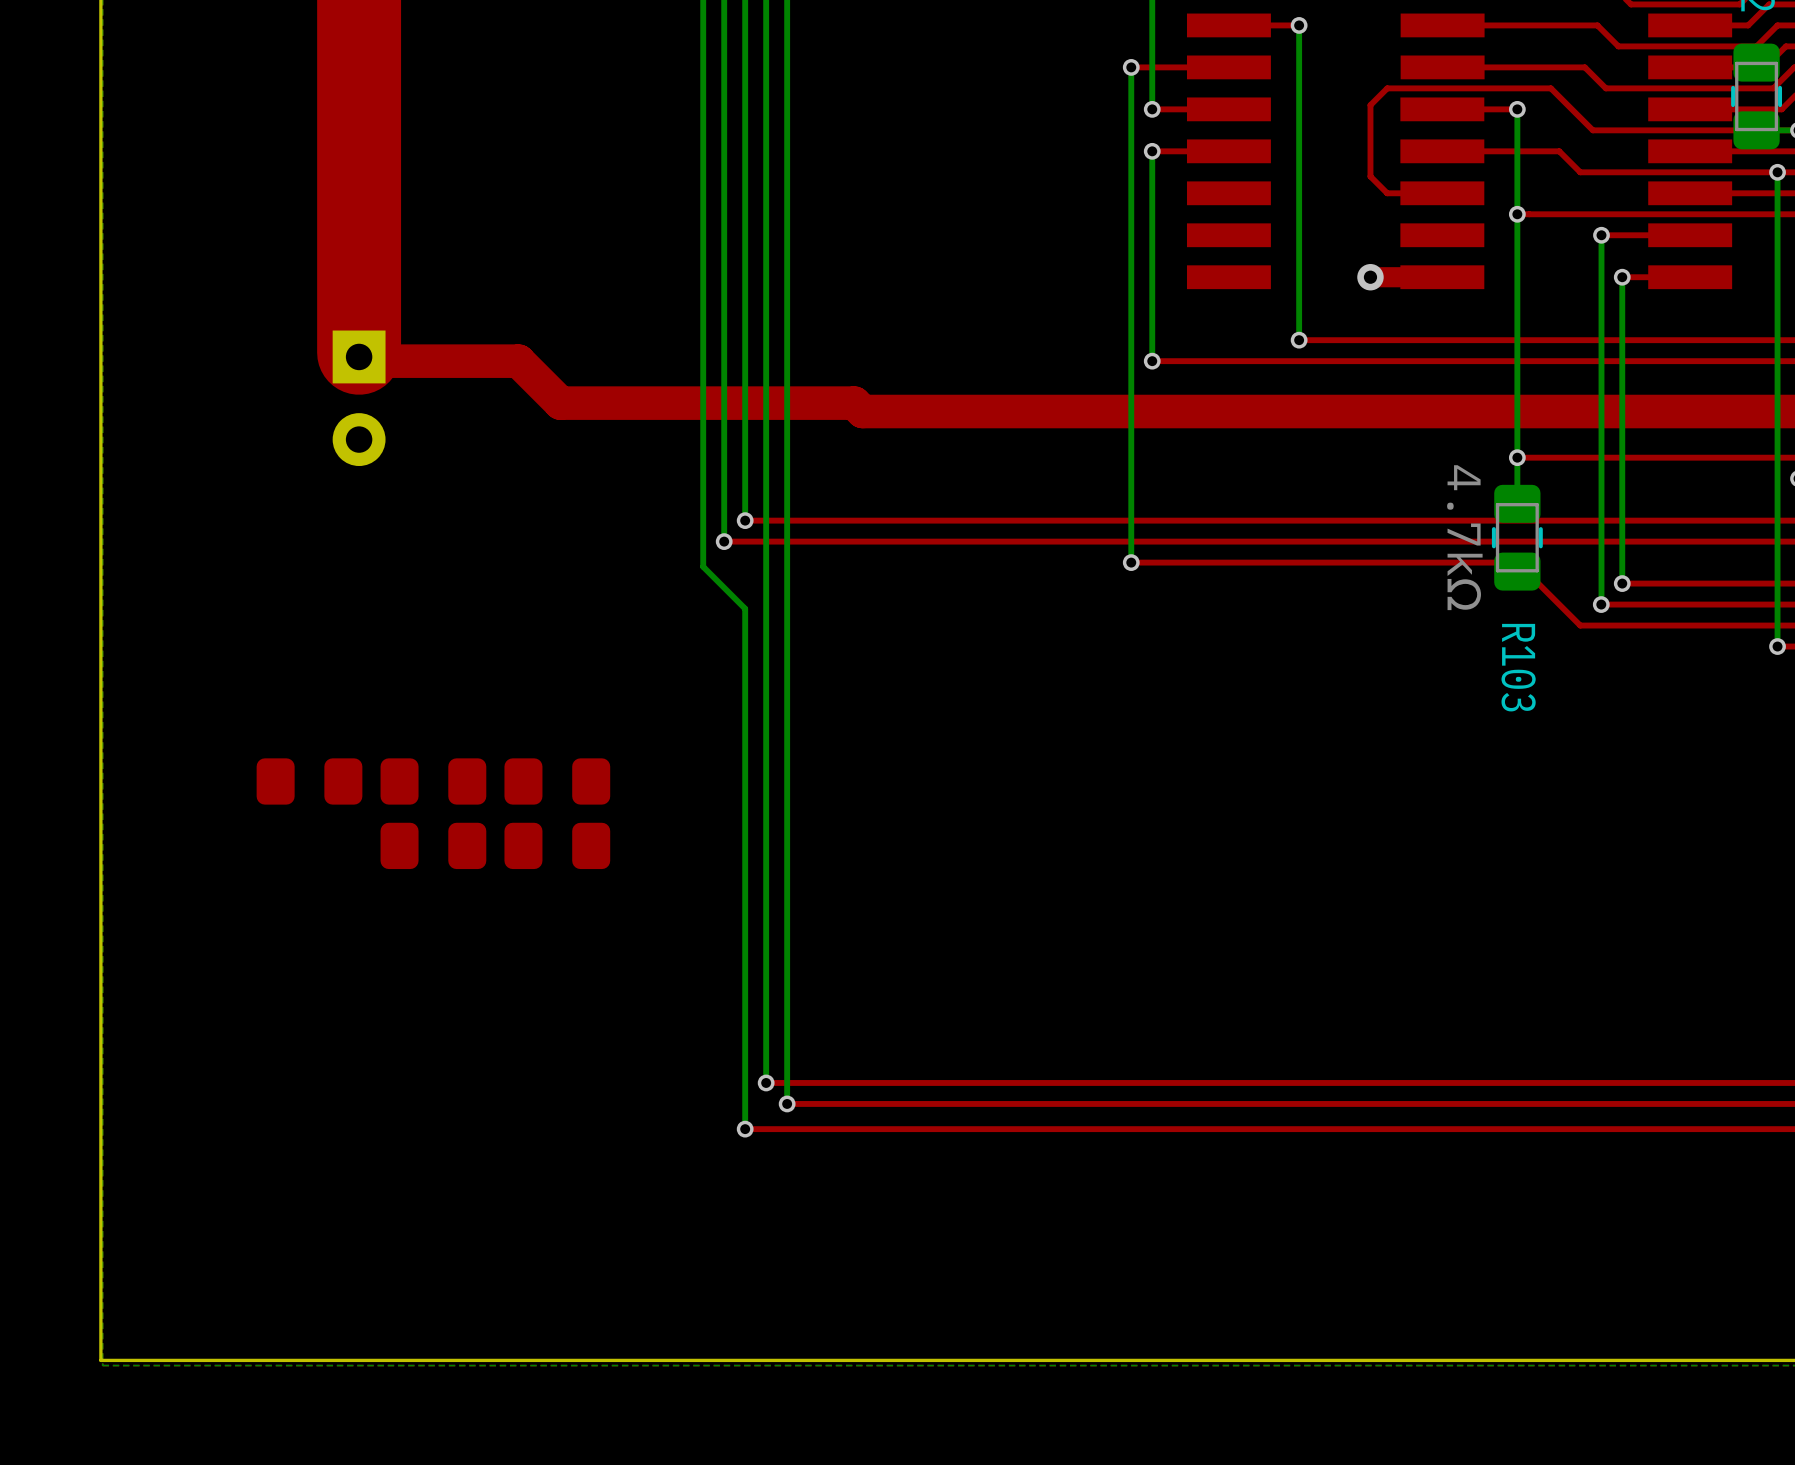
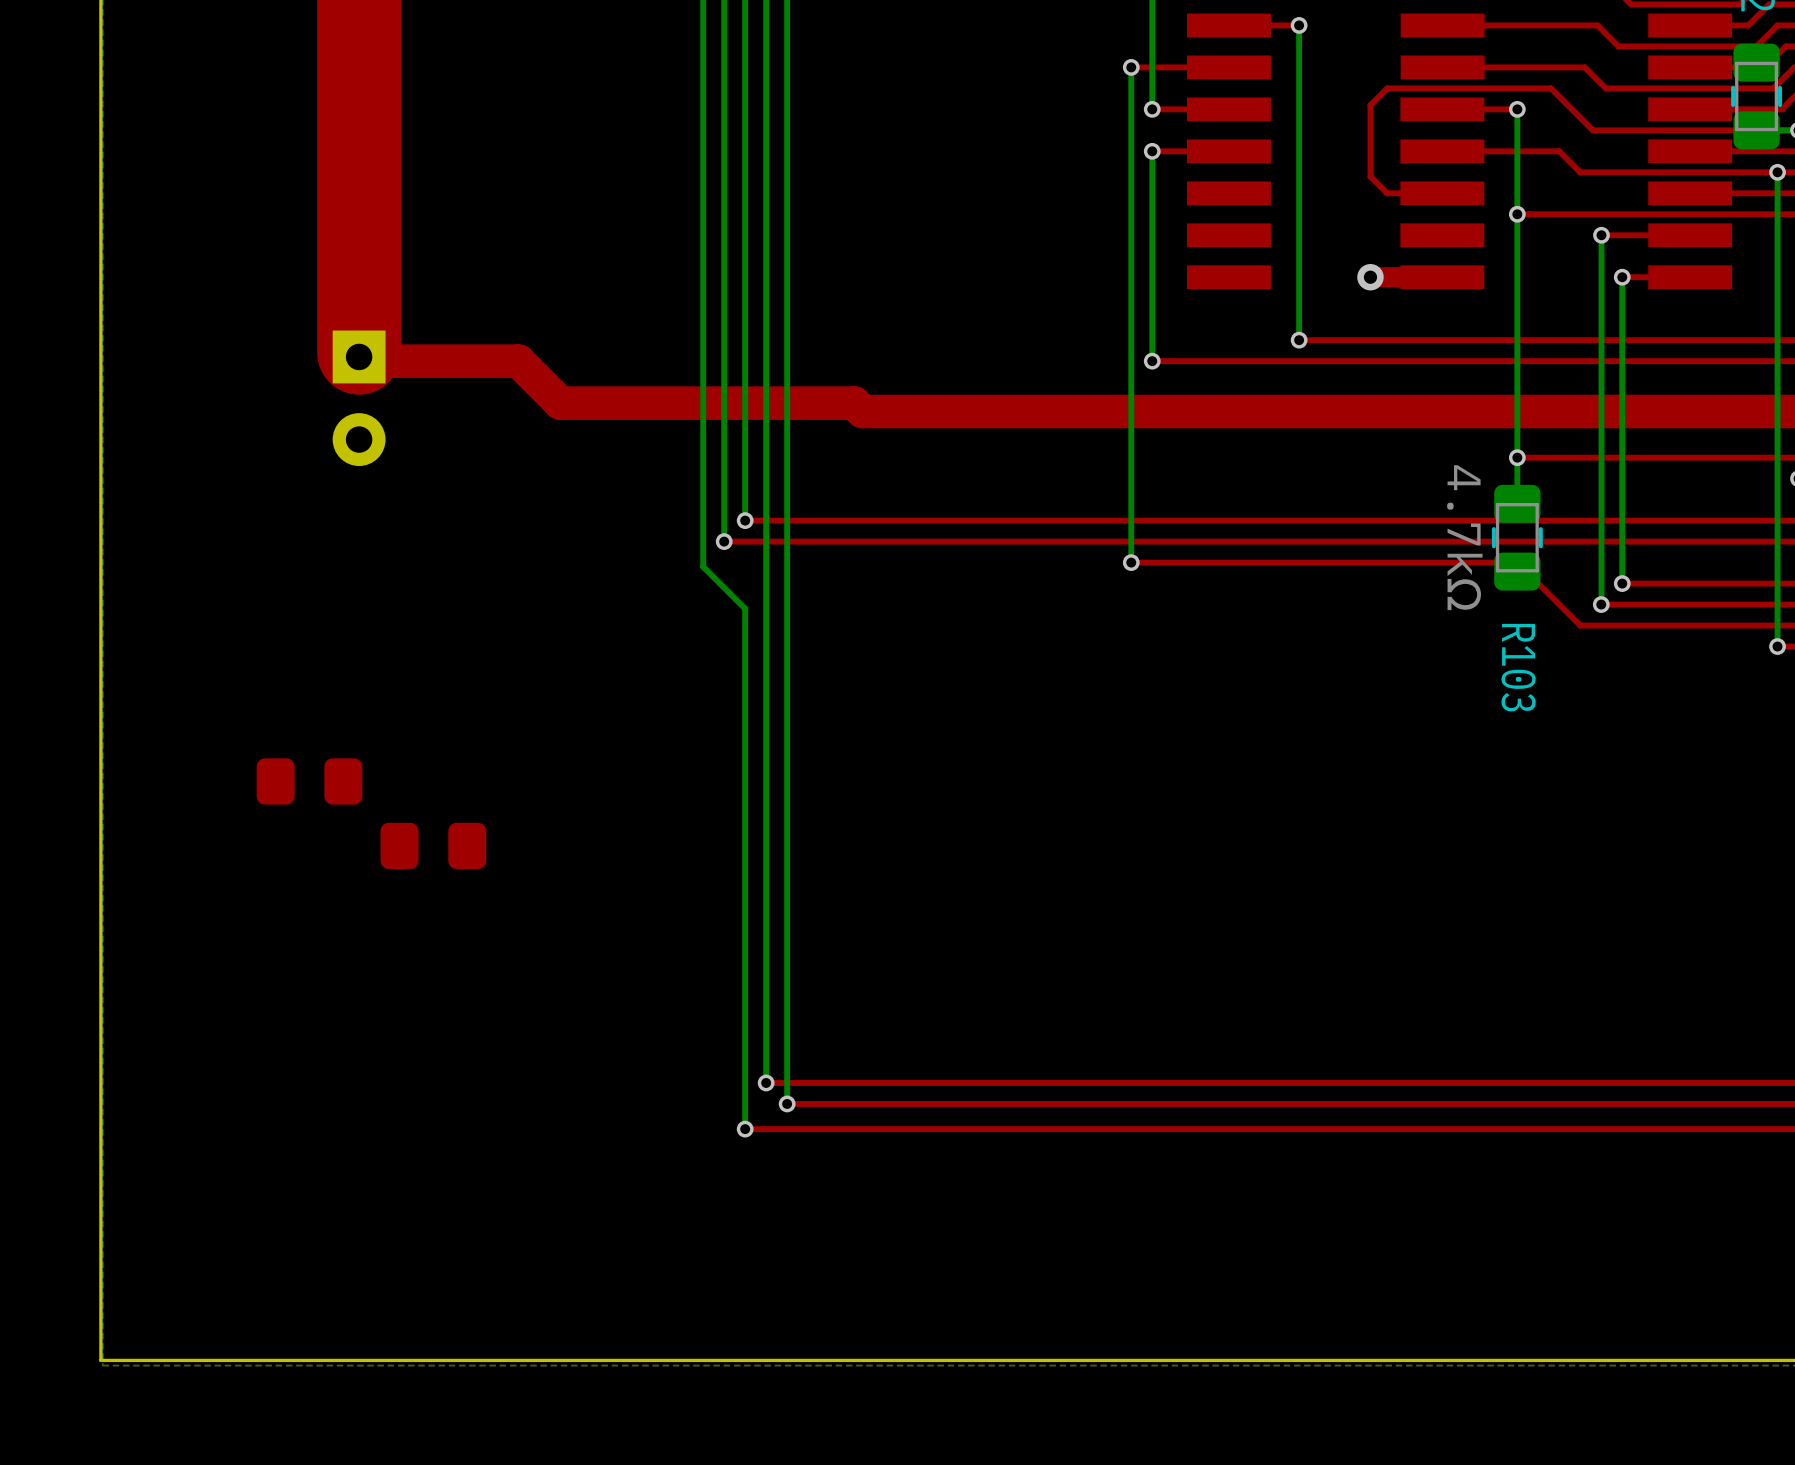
part: (433, 781) -> none
part: (557, 781) -> none
part: (557, 845) -> none

